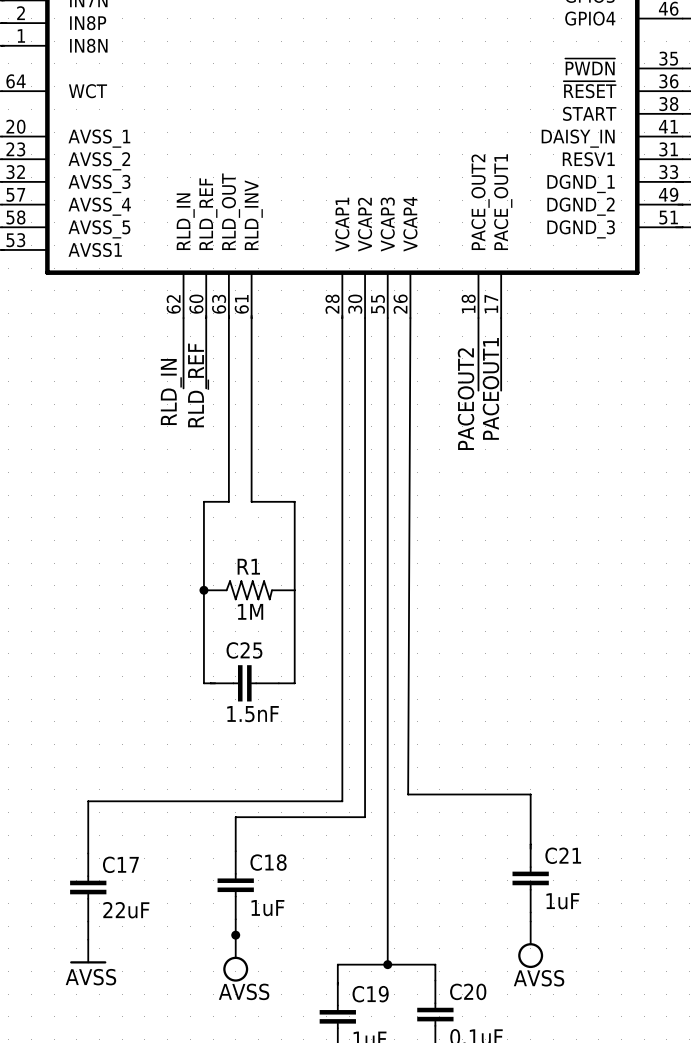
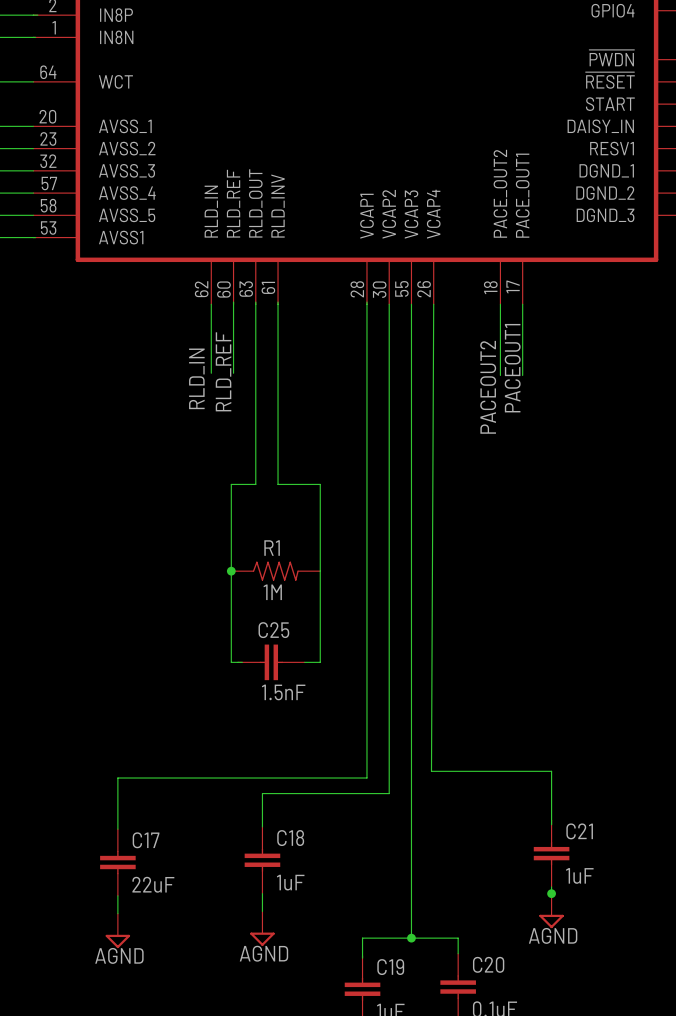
junction: none -> (551, 893)
junction: (235, 935) -> none
power symbol: AVSS (530, 944) -> AGND (551, 910)
power symbol: AVSS (88, 951) -> AGND (117, 930)
power symbol: AVSS (235, 958) -> AGND (262, 928)

